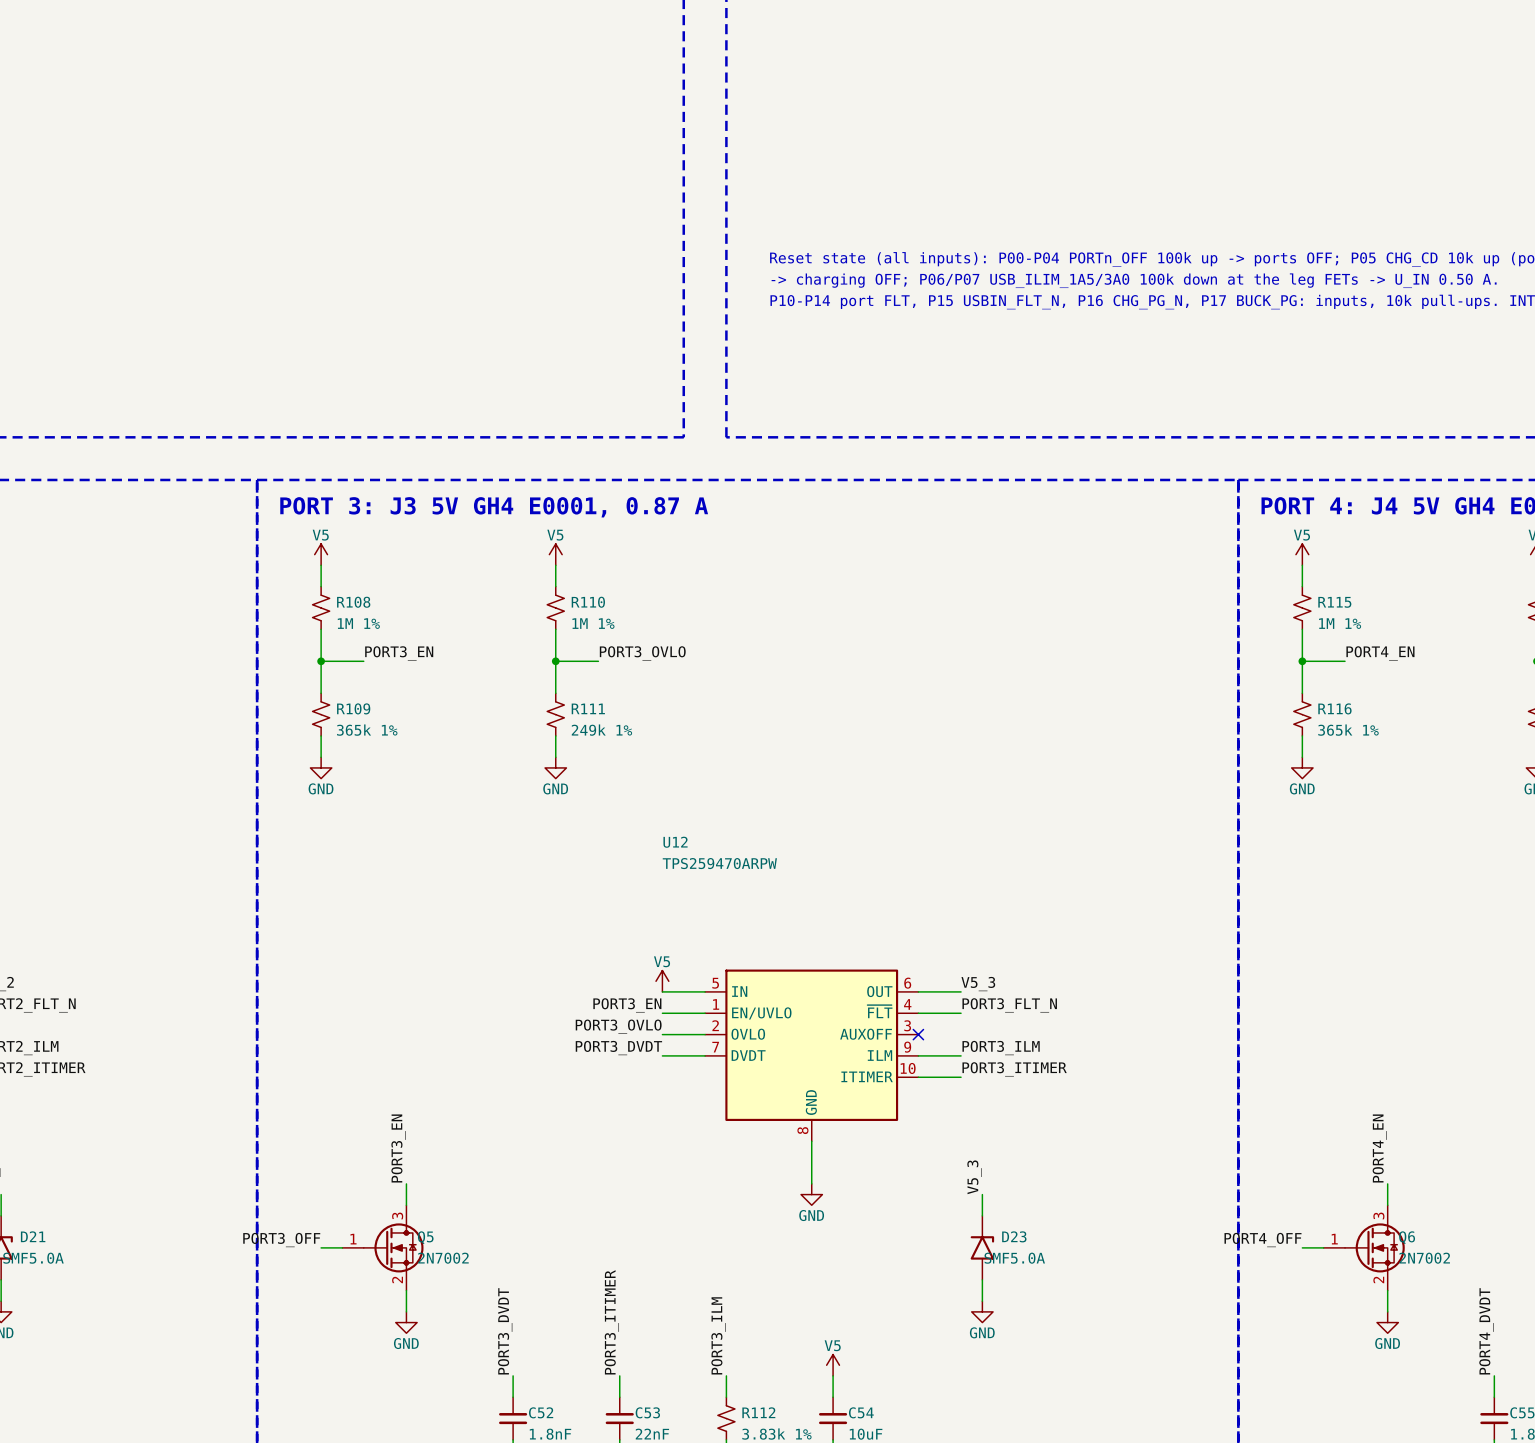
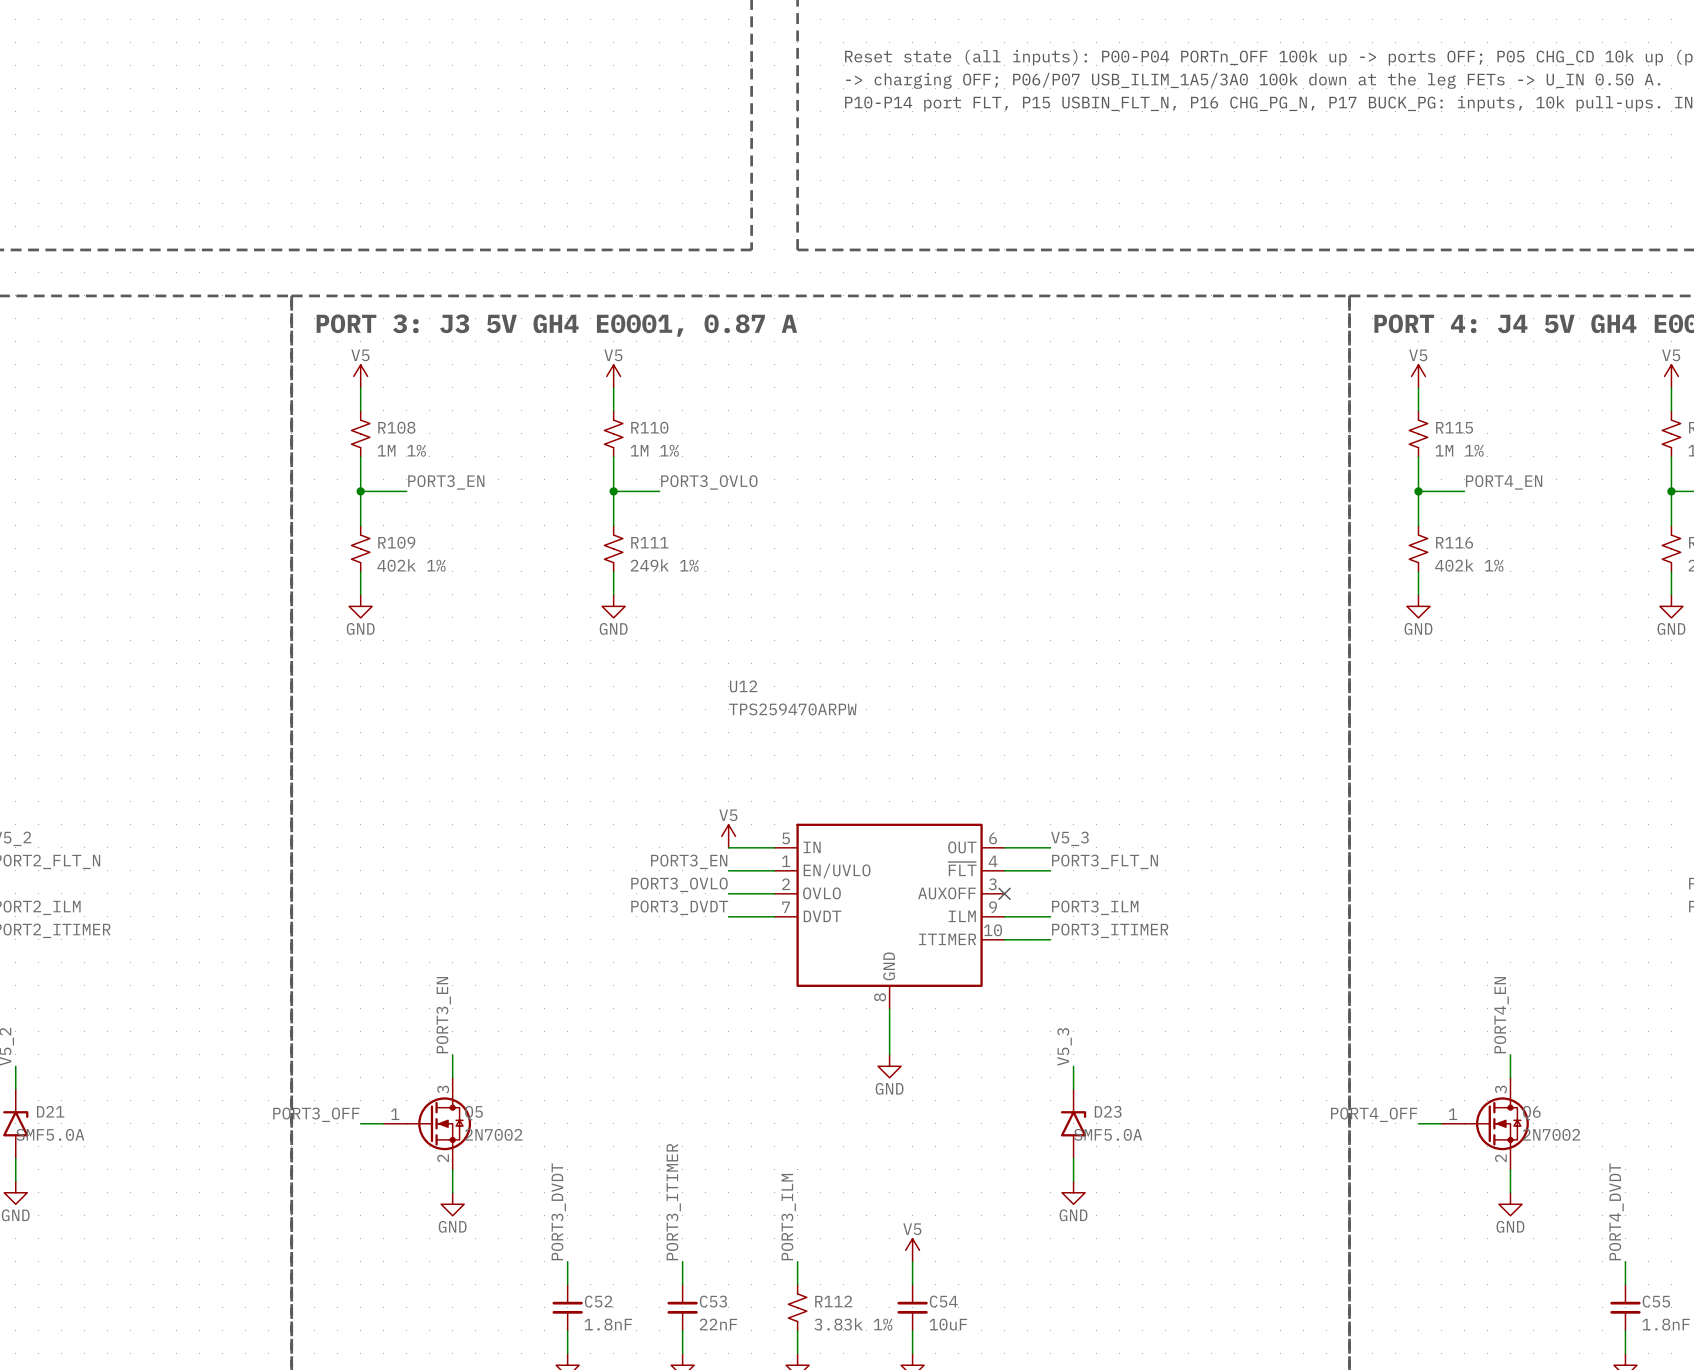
R109 value: 365k 1% (367, 730) -> 402k 1% (411, 565)
R116 value: 365k 1% (1348, 730) -> 402k 1% (1469, 565)

